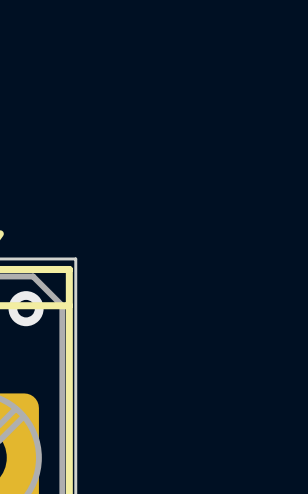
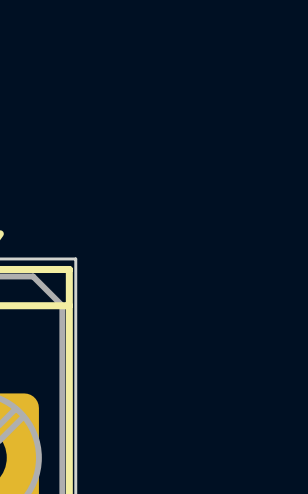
via: (26, 308) -> none

